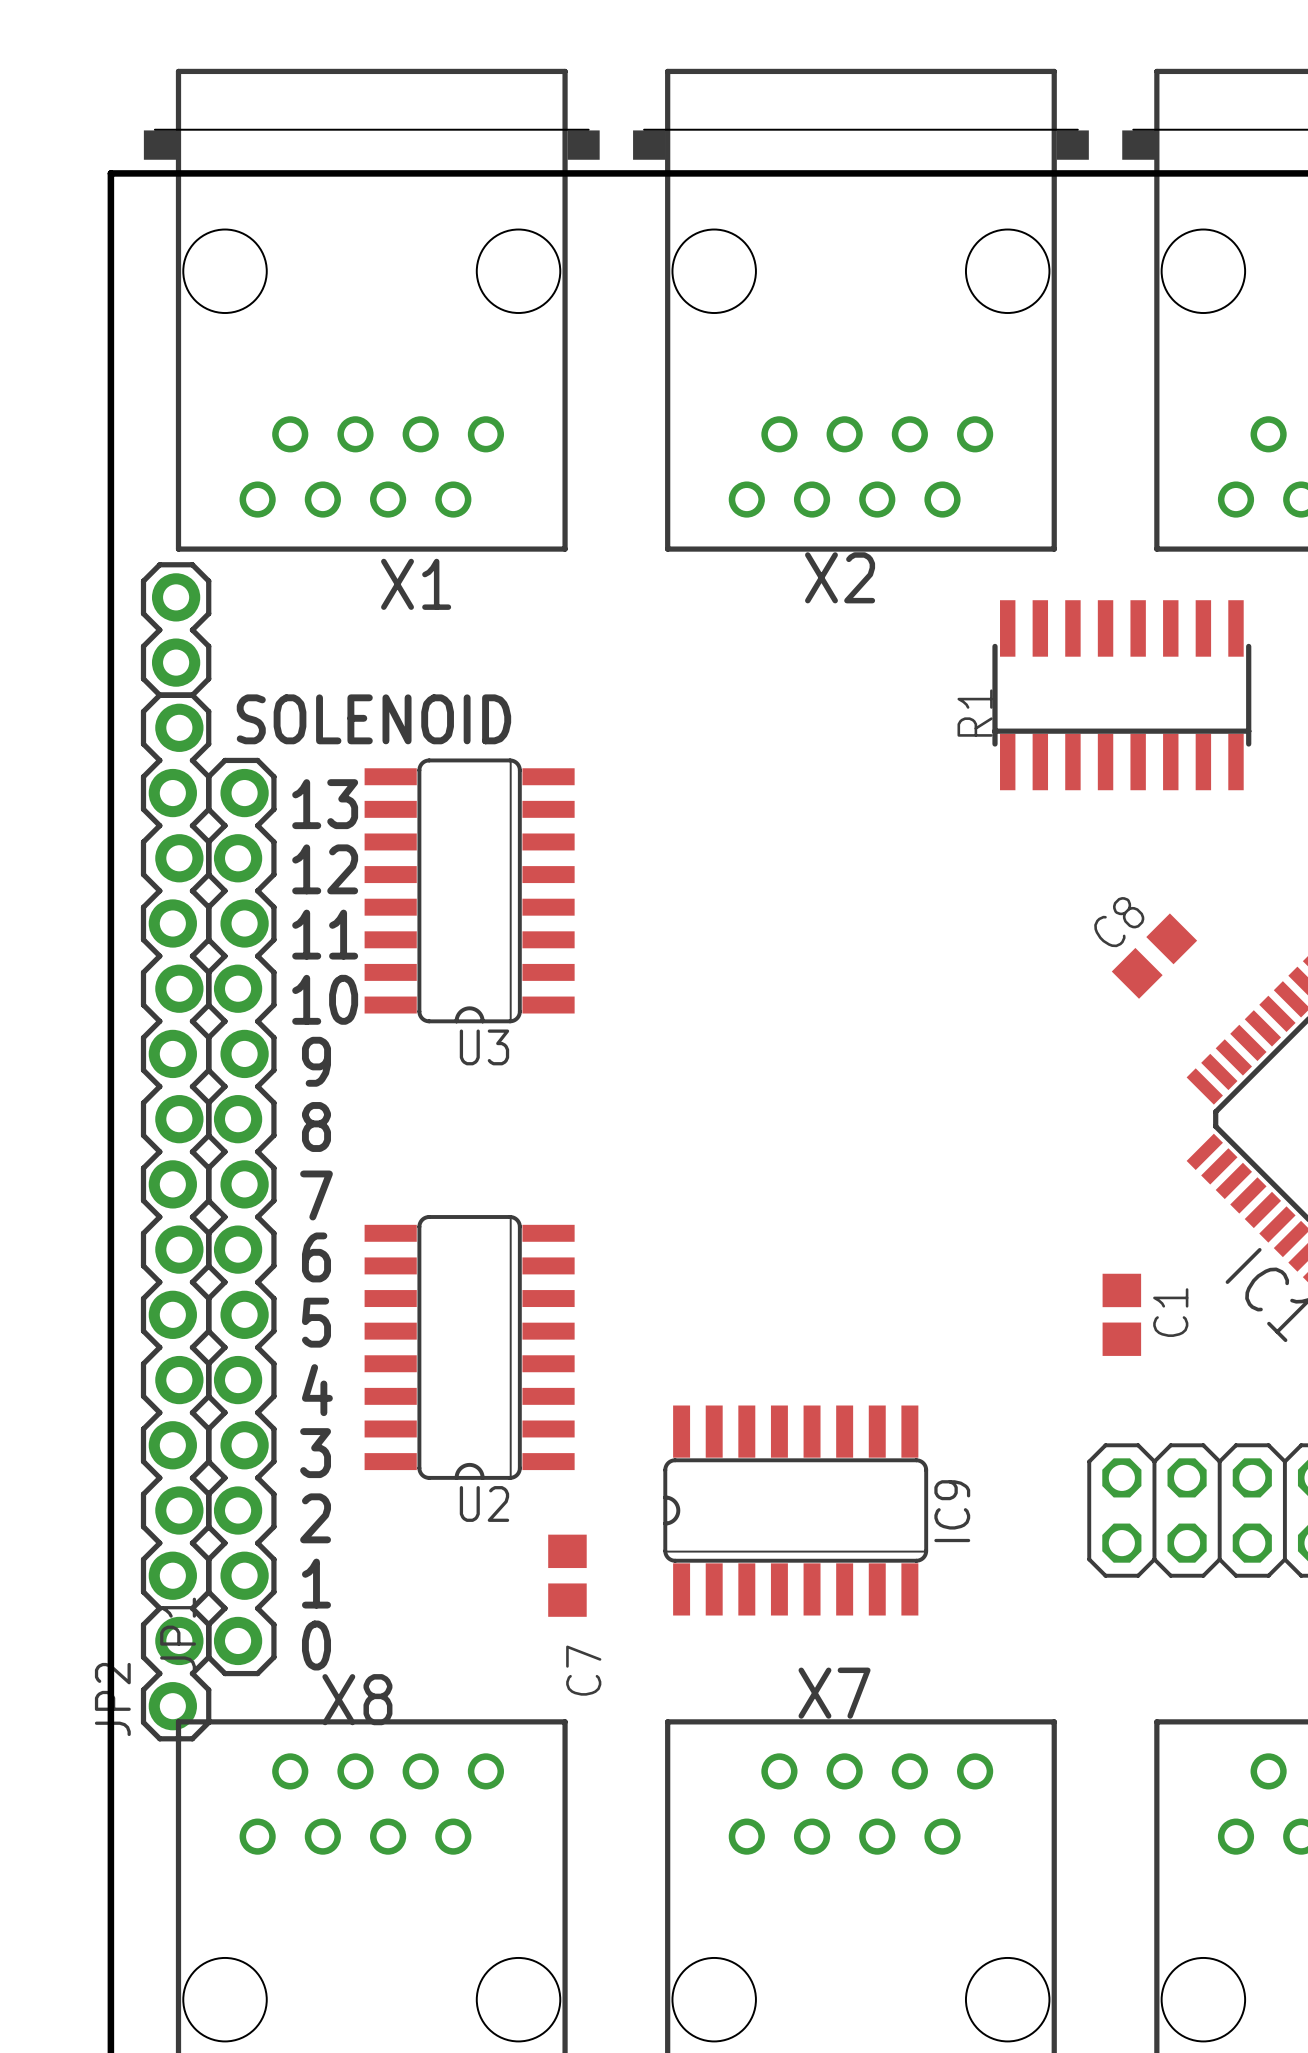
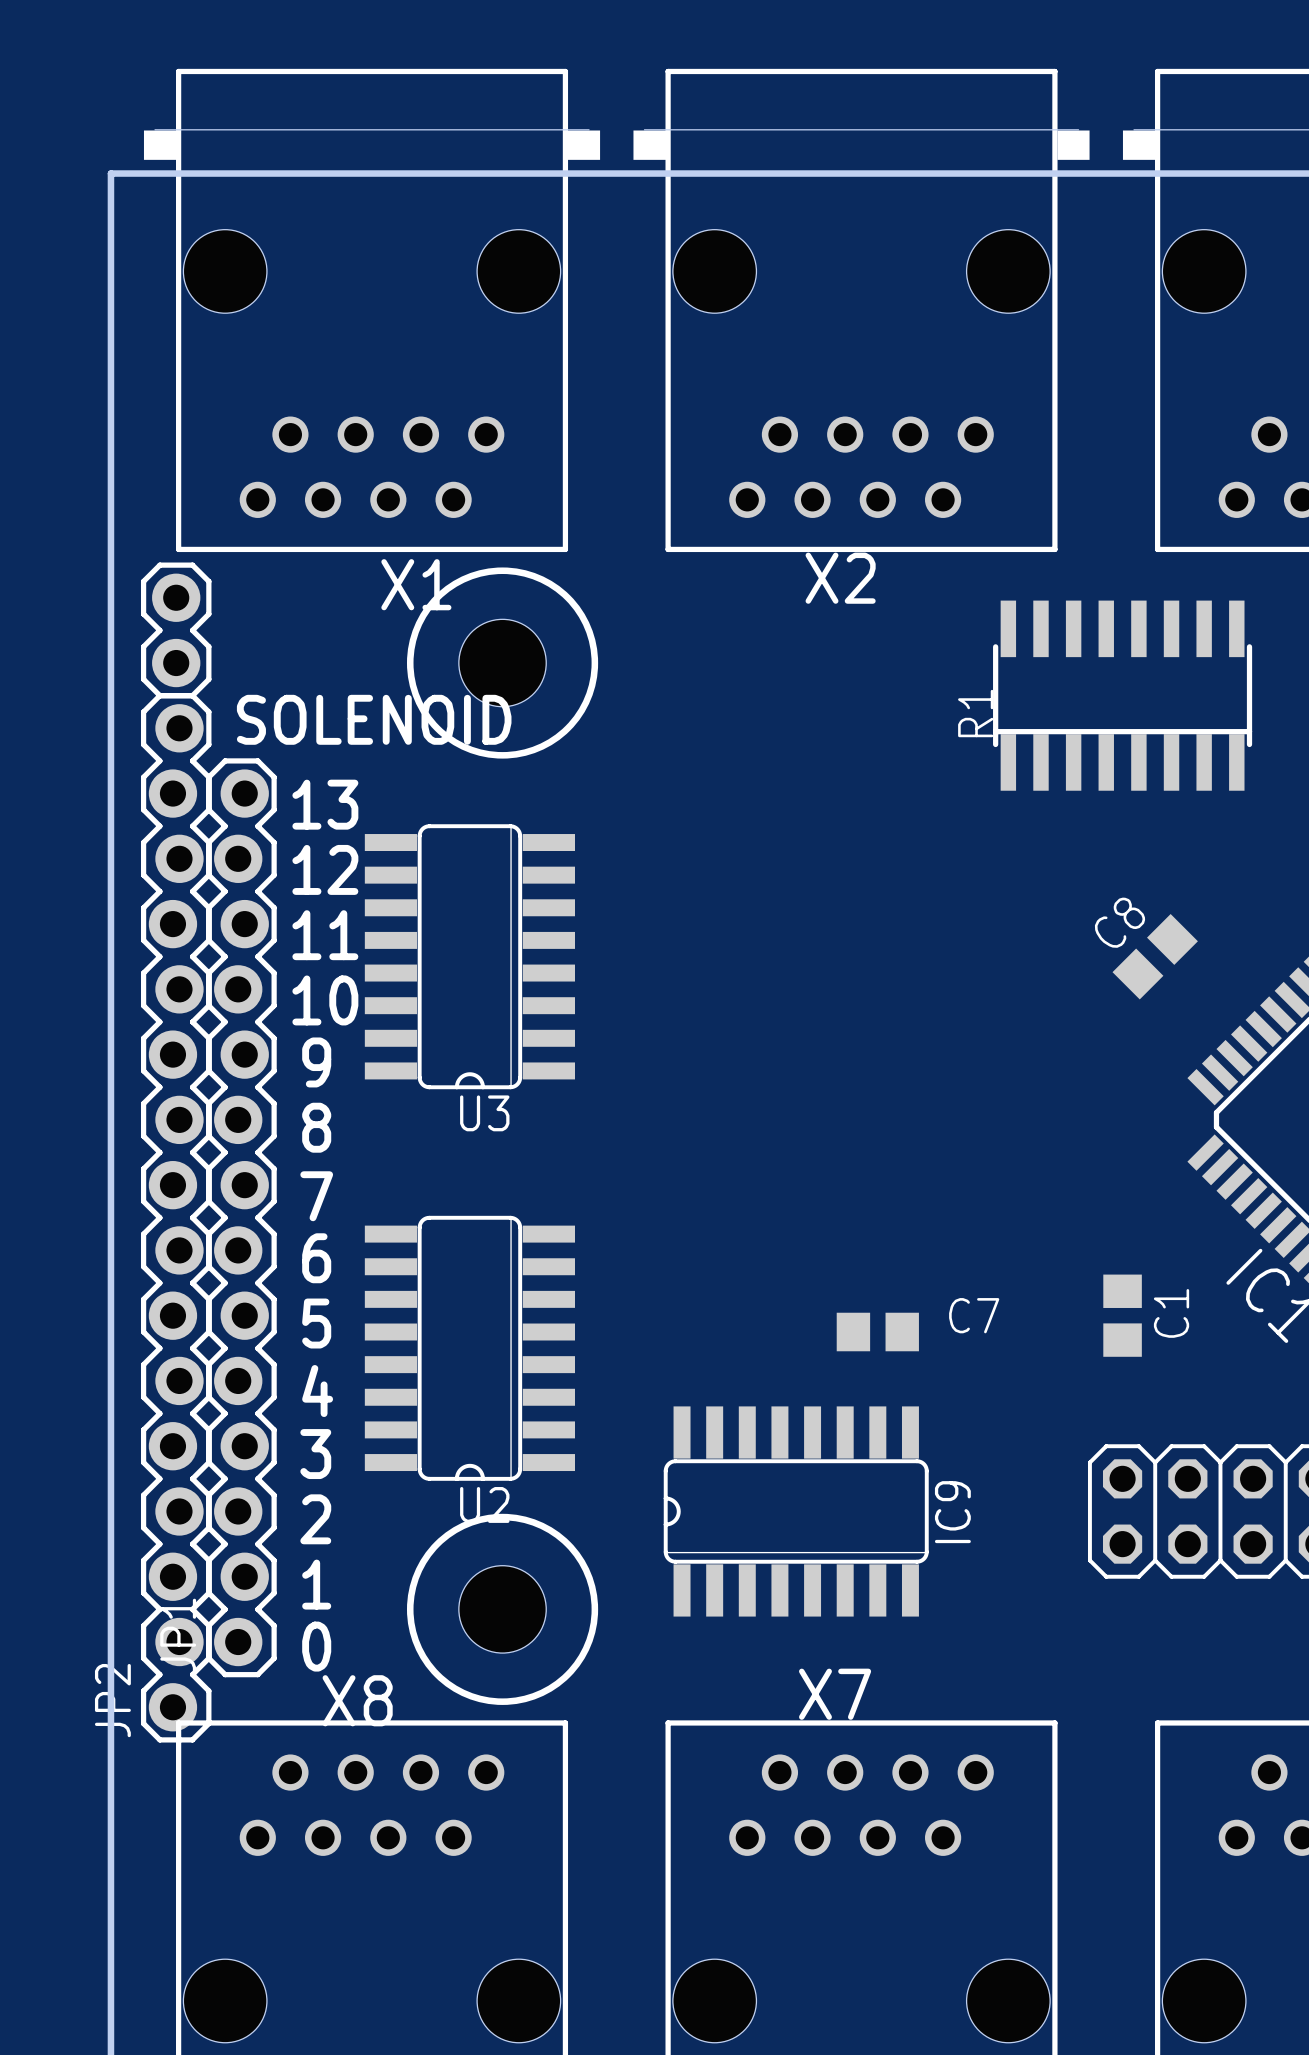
drawing: none -> [406, 567, 599, 759]
hole: none -> (502, 663)
U3 position: (469, 890) -> (469, 956)
drawing: none -> [406, 1513, 599, 1705]
C7 rotation: 0° (567, 1575) -> 90° clockwise (877, 1332)
C7 position: (567, 1575) -> (877, 1332)
hole: none -> (502, 1609)
C7 name position: C7 (583, 1670) -> C7 (974, 1315)

